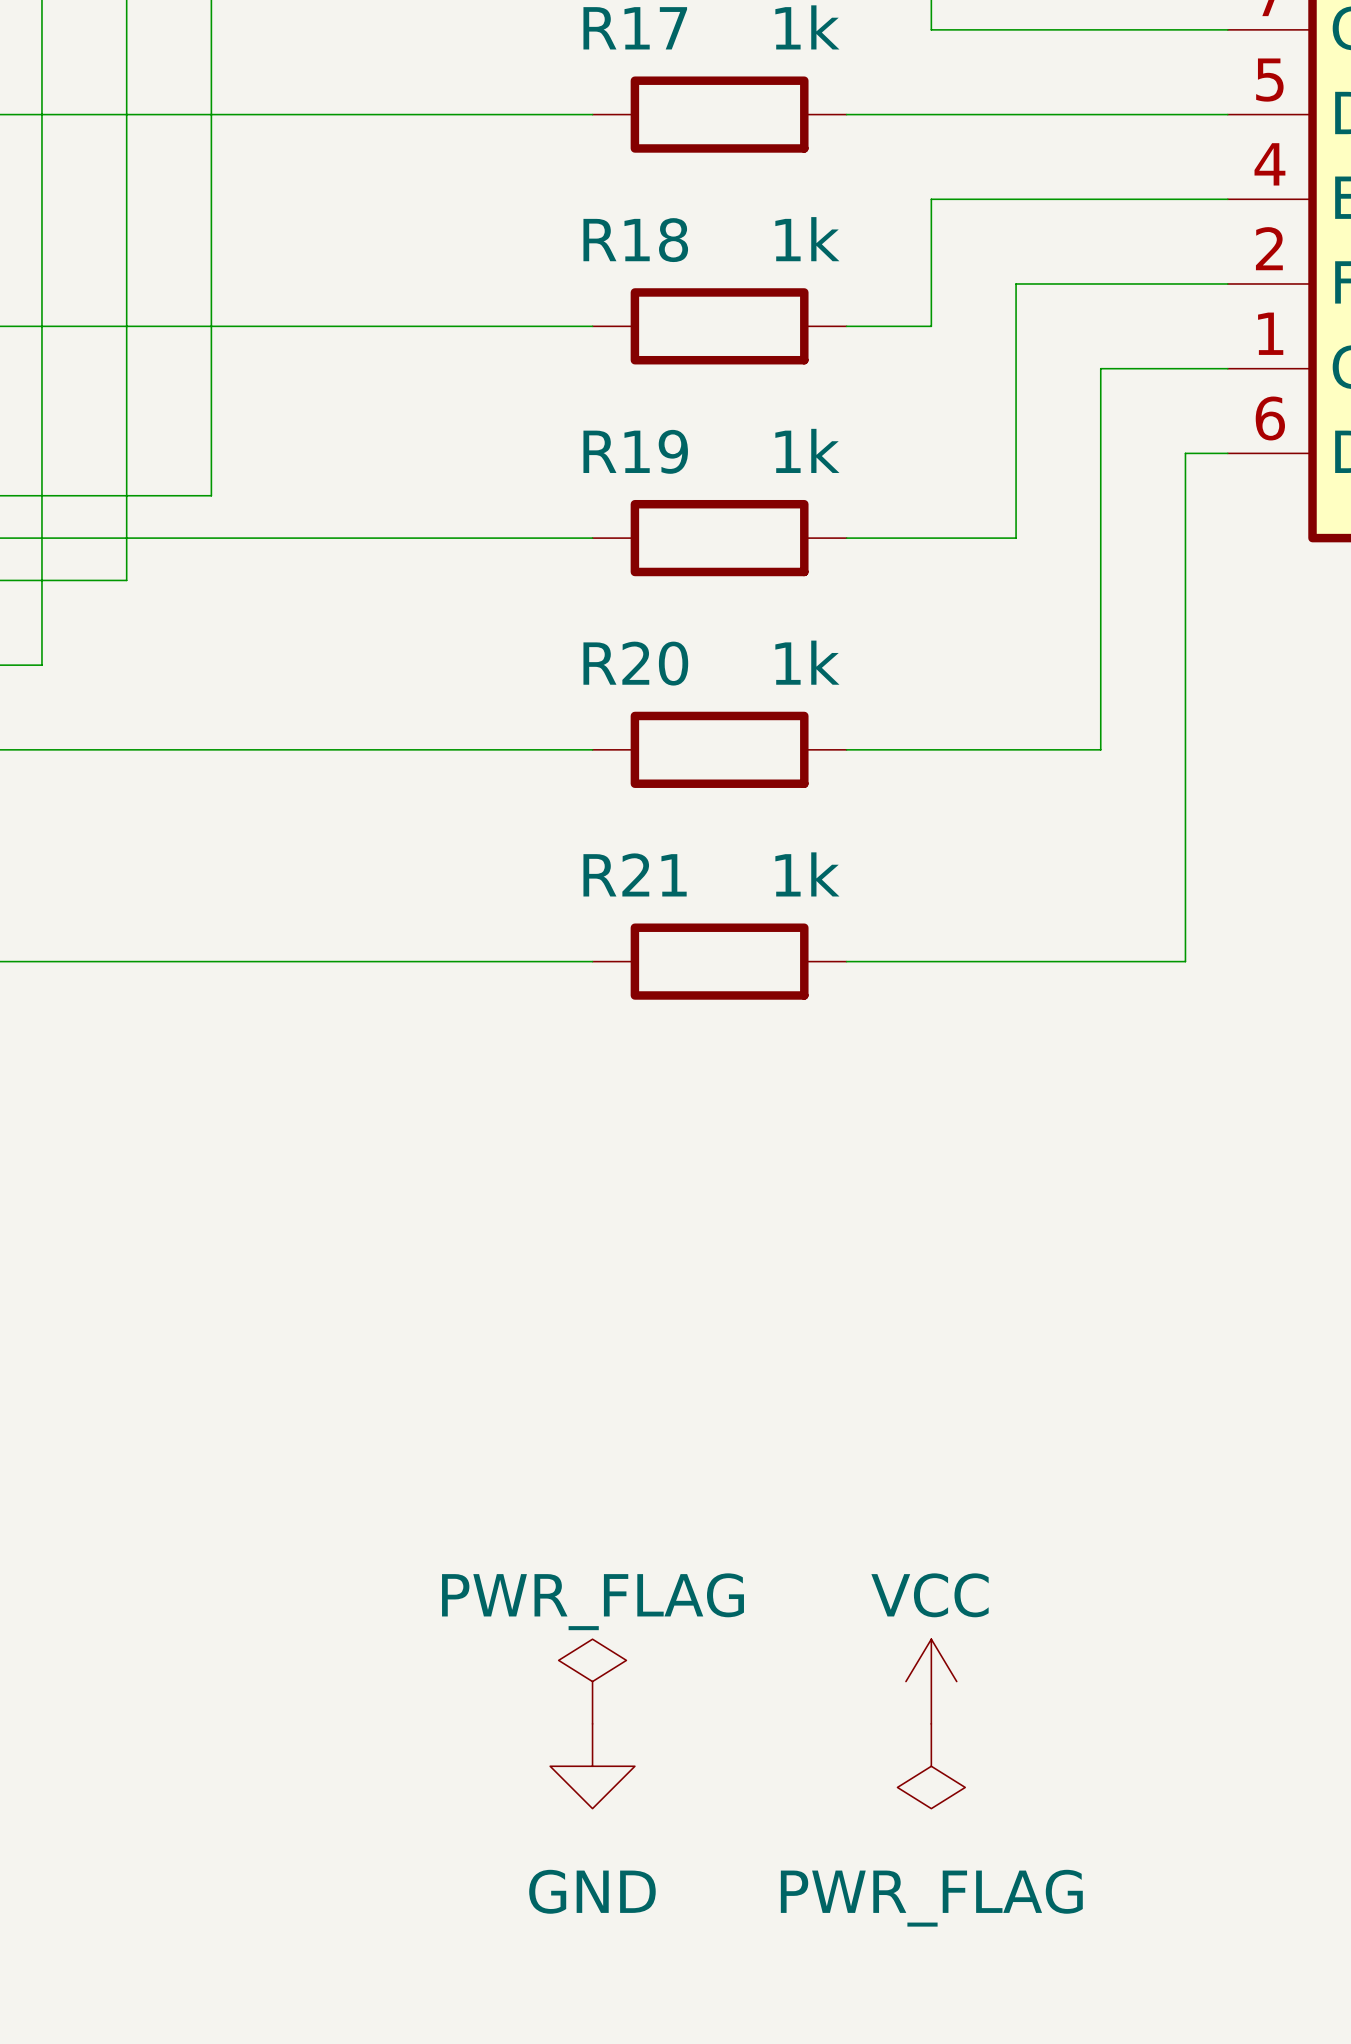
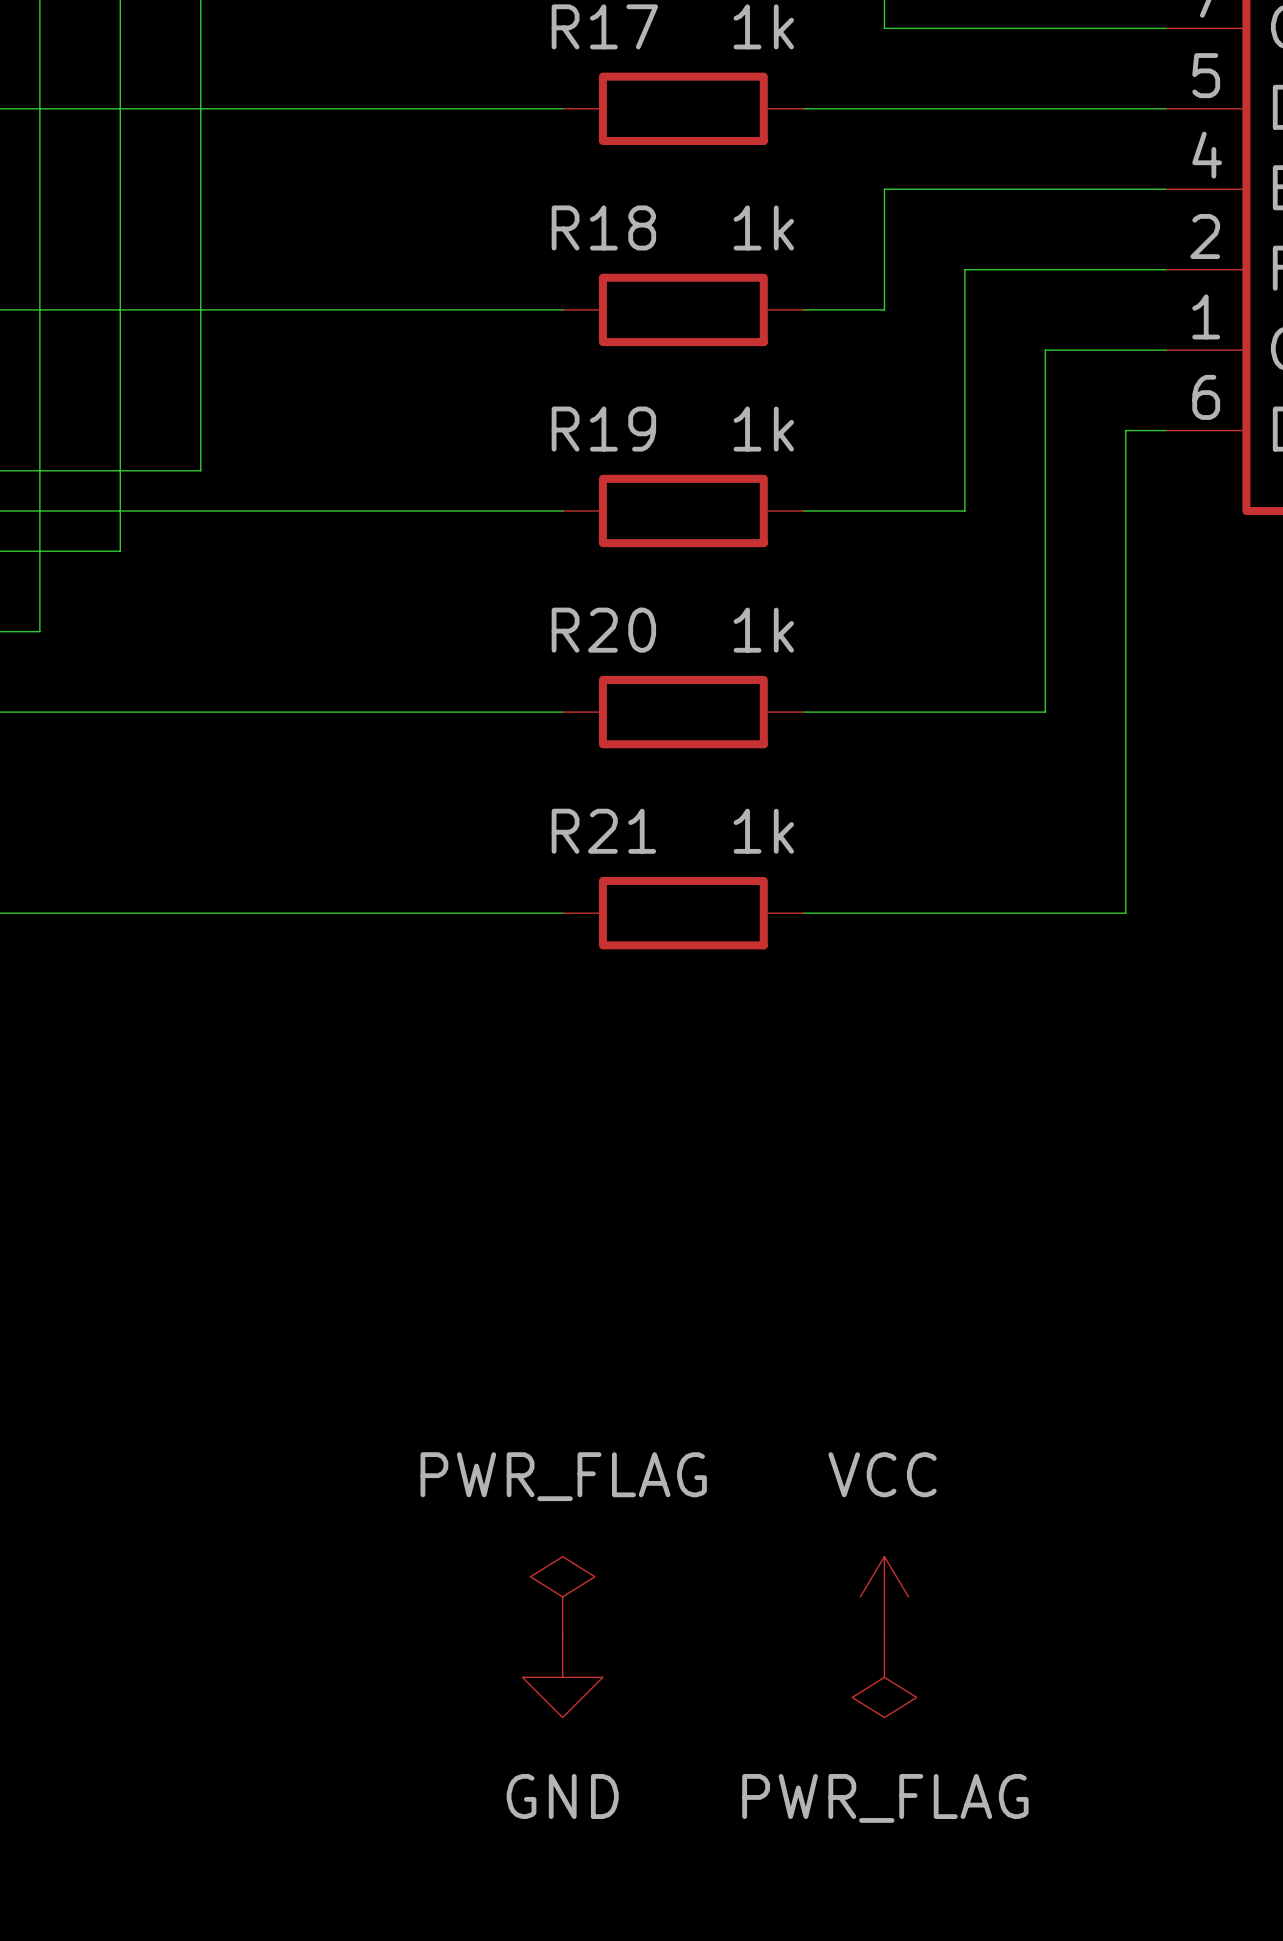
power symbol text position: VCC (930, 1595) -> VCC (882, 1474)
power symbol text position: PWR_FLAG (593, 1601) -> PWR_FLAG (563, 1476)

